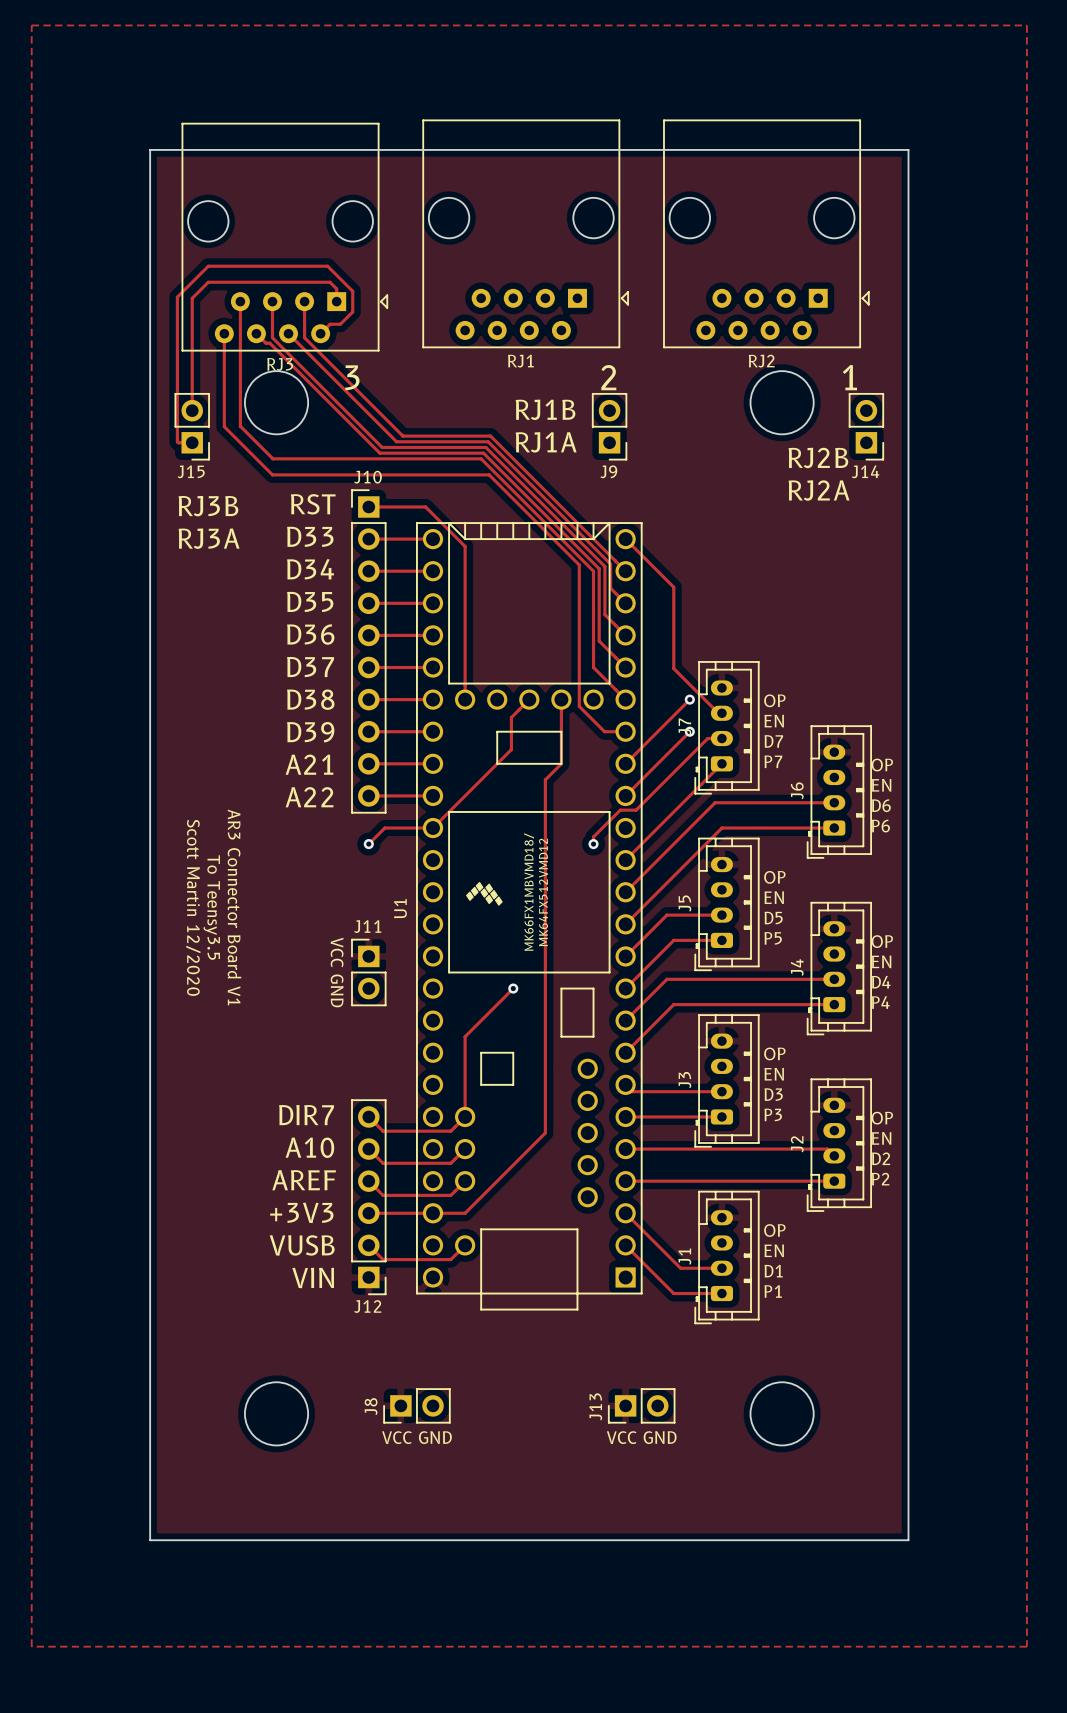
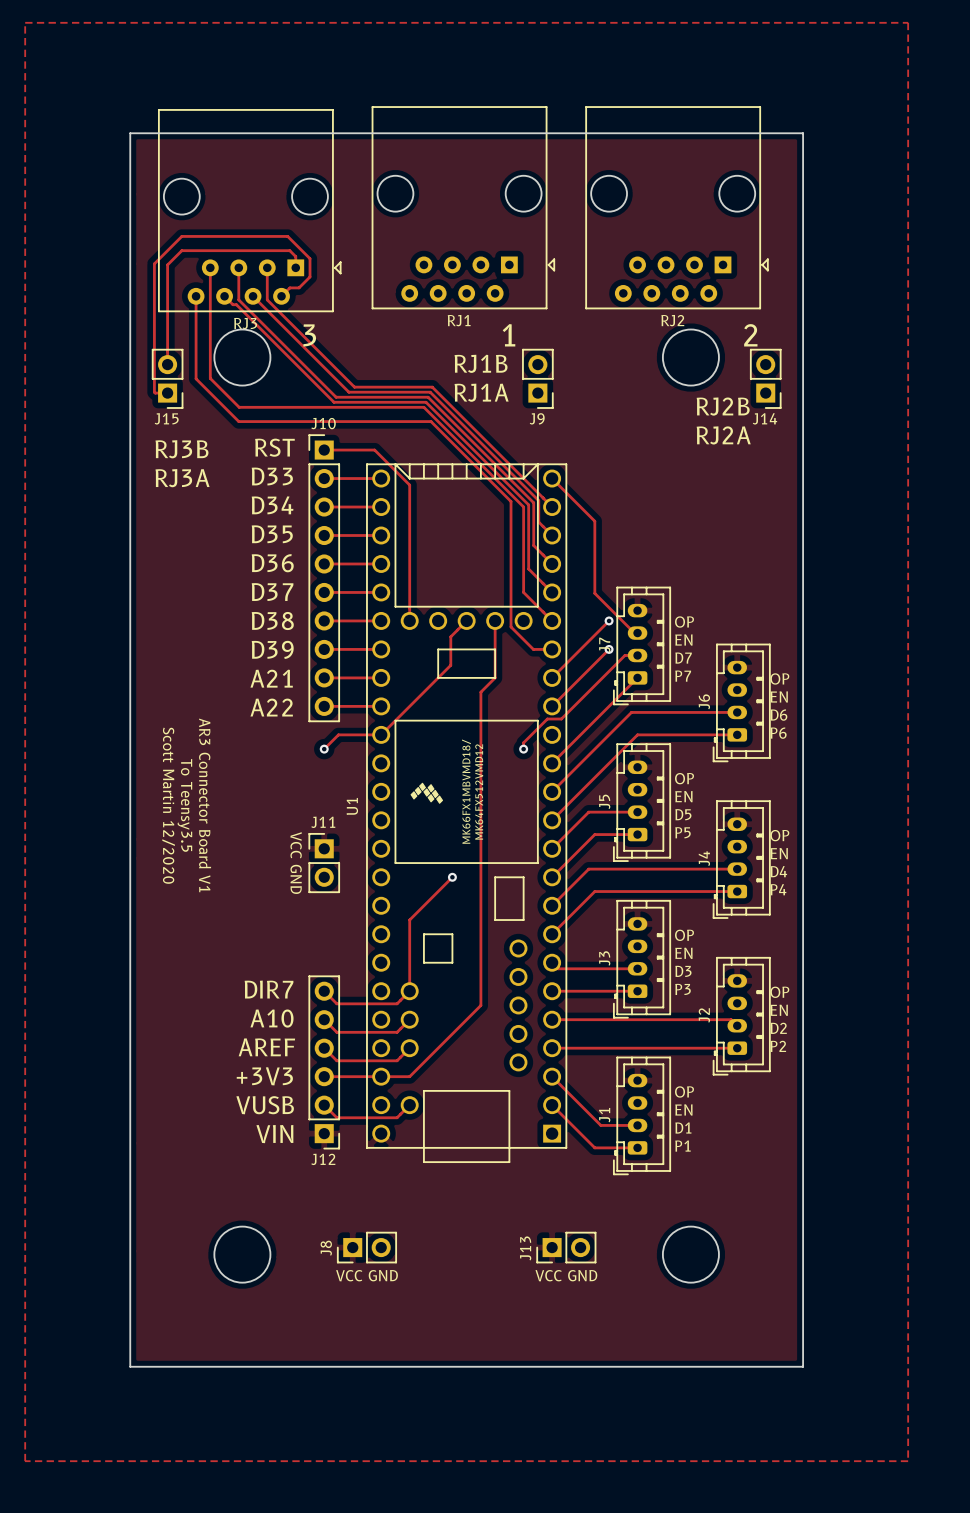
text: none -> 1 (508, 335)
text: 2 (608, 377) -> none
text: 1 (849, 377) -> 2 (750, 335)

